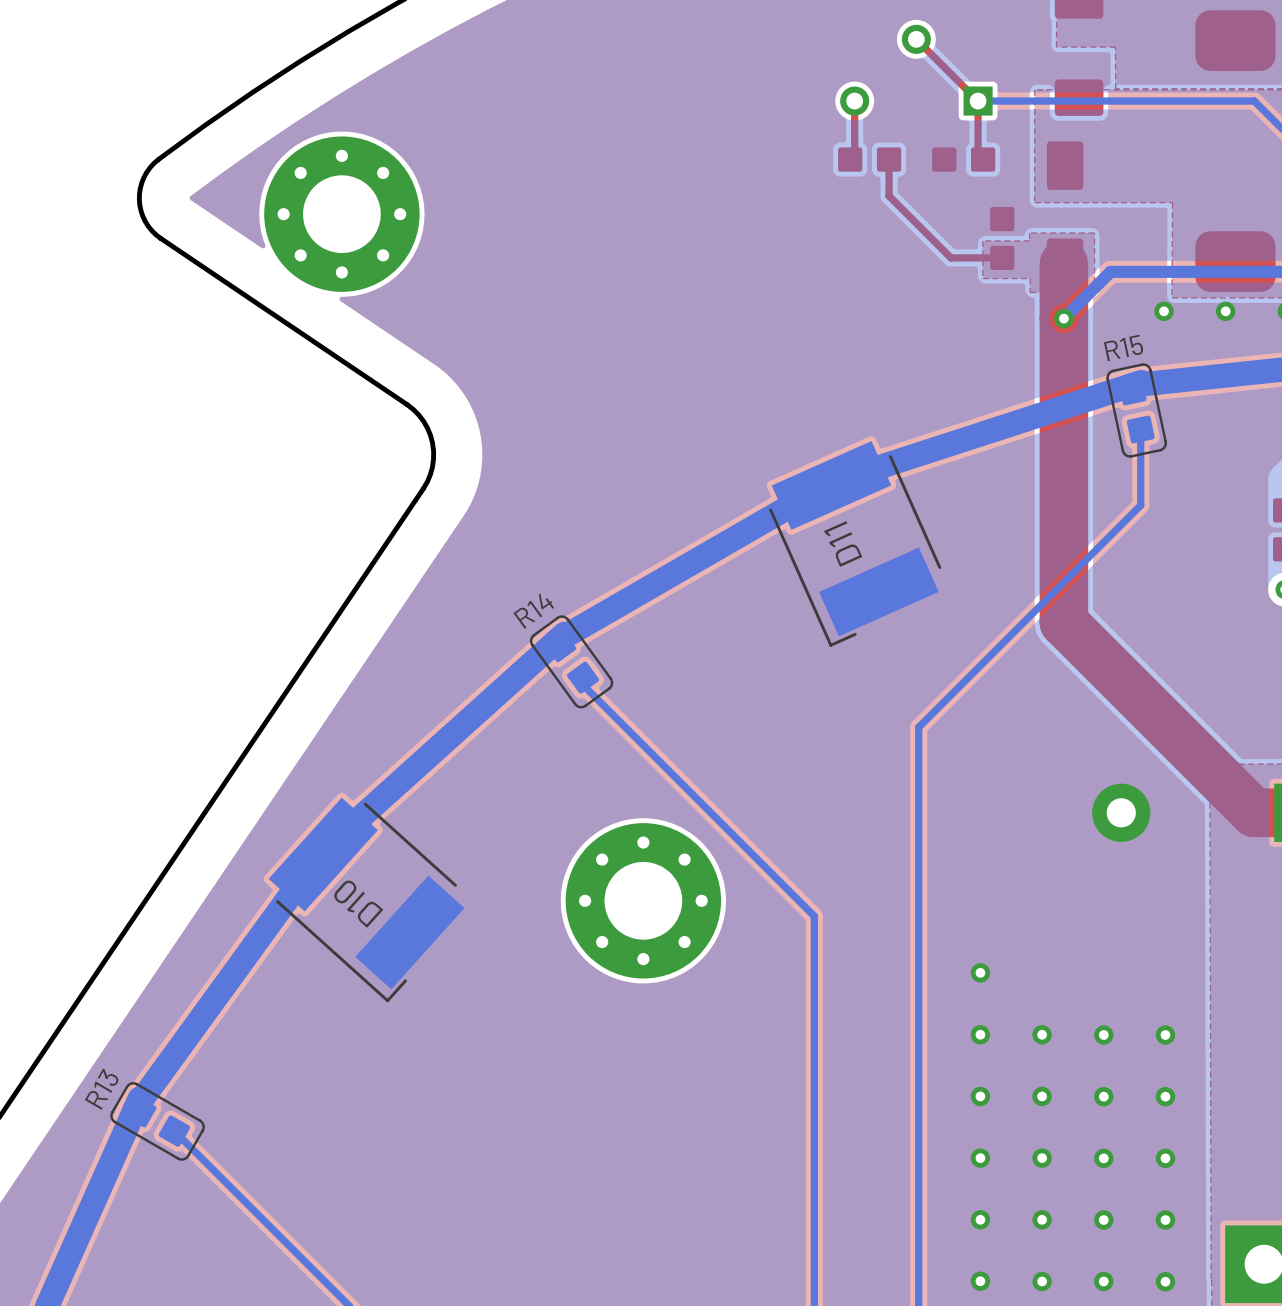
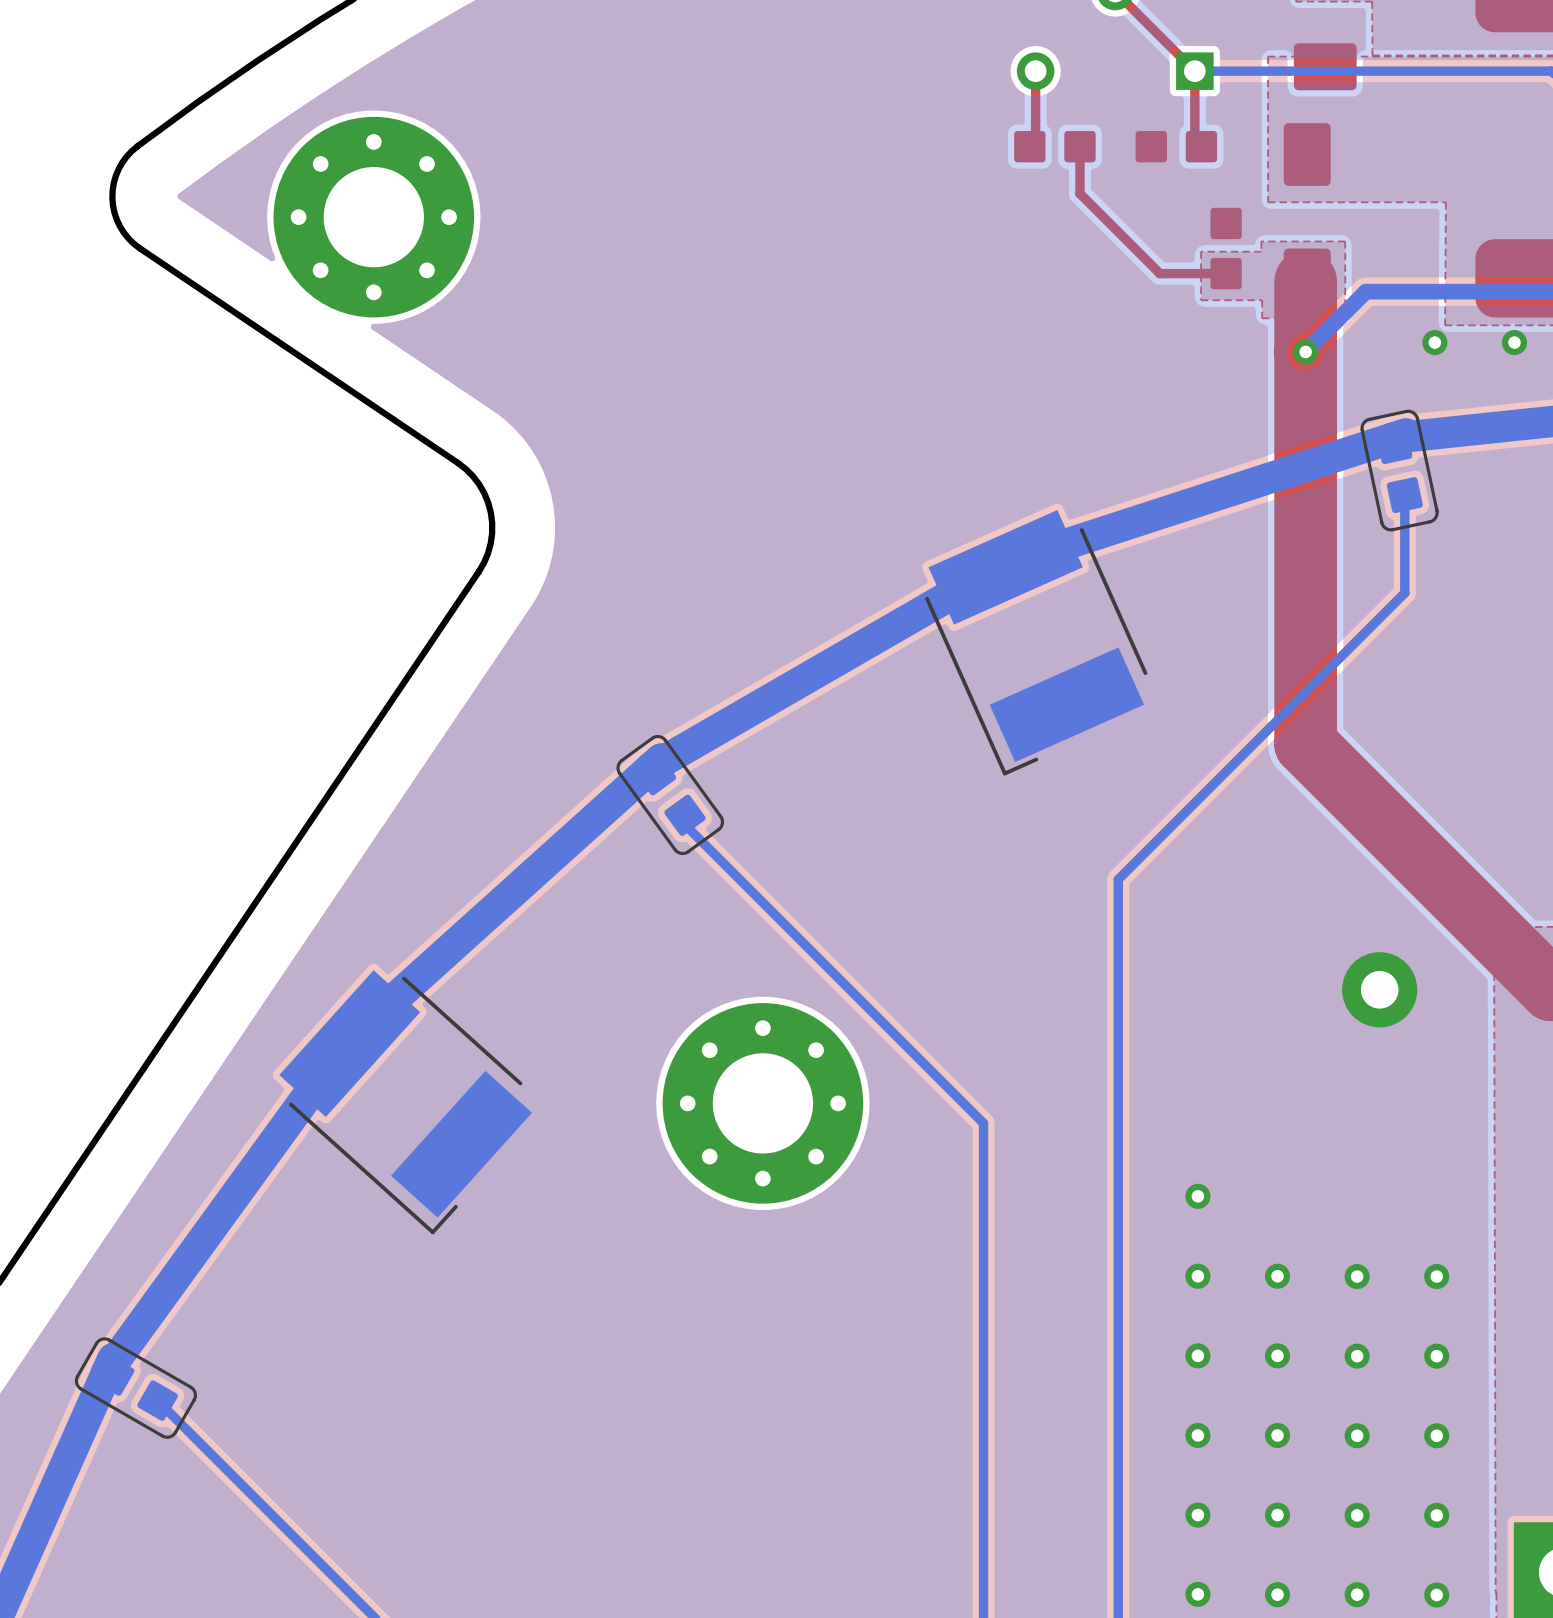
R15 name: R15 (1123, 348) -> none
D11 name: D11 (843, 543) -> none
R14 name: R14 (533, 611) -> none
D10 name: D10 (358, 904) -> none
R13 name: R13 (101, 1089) -> none

